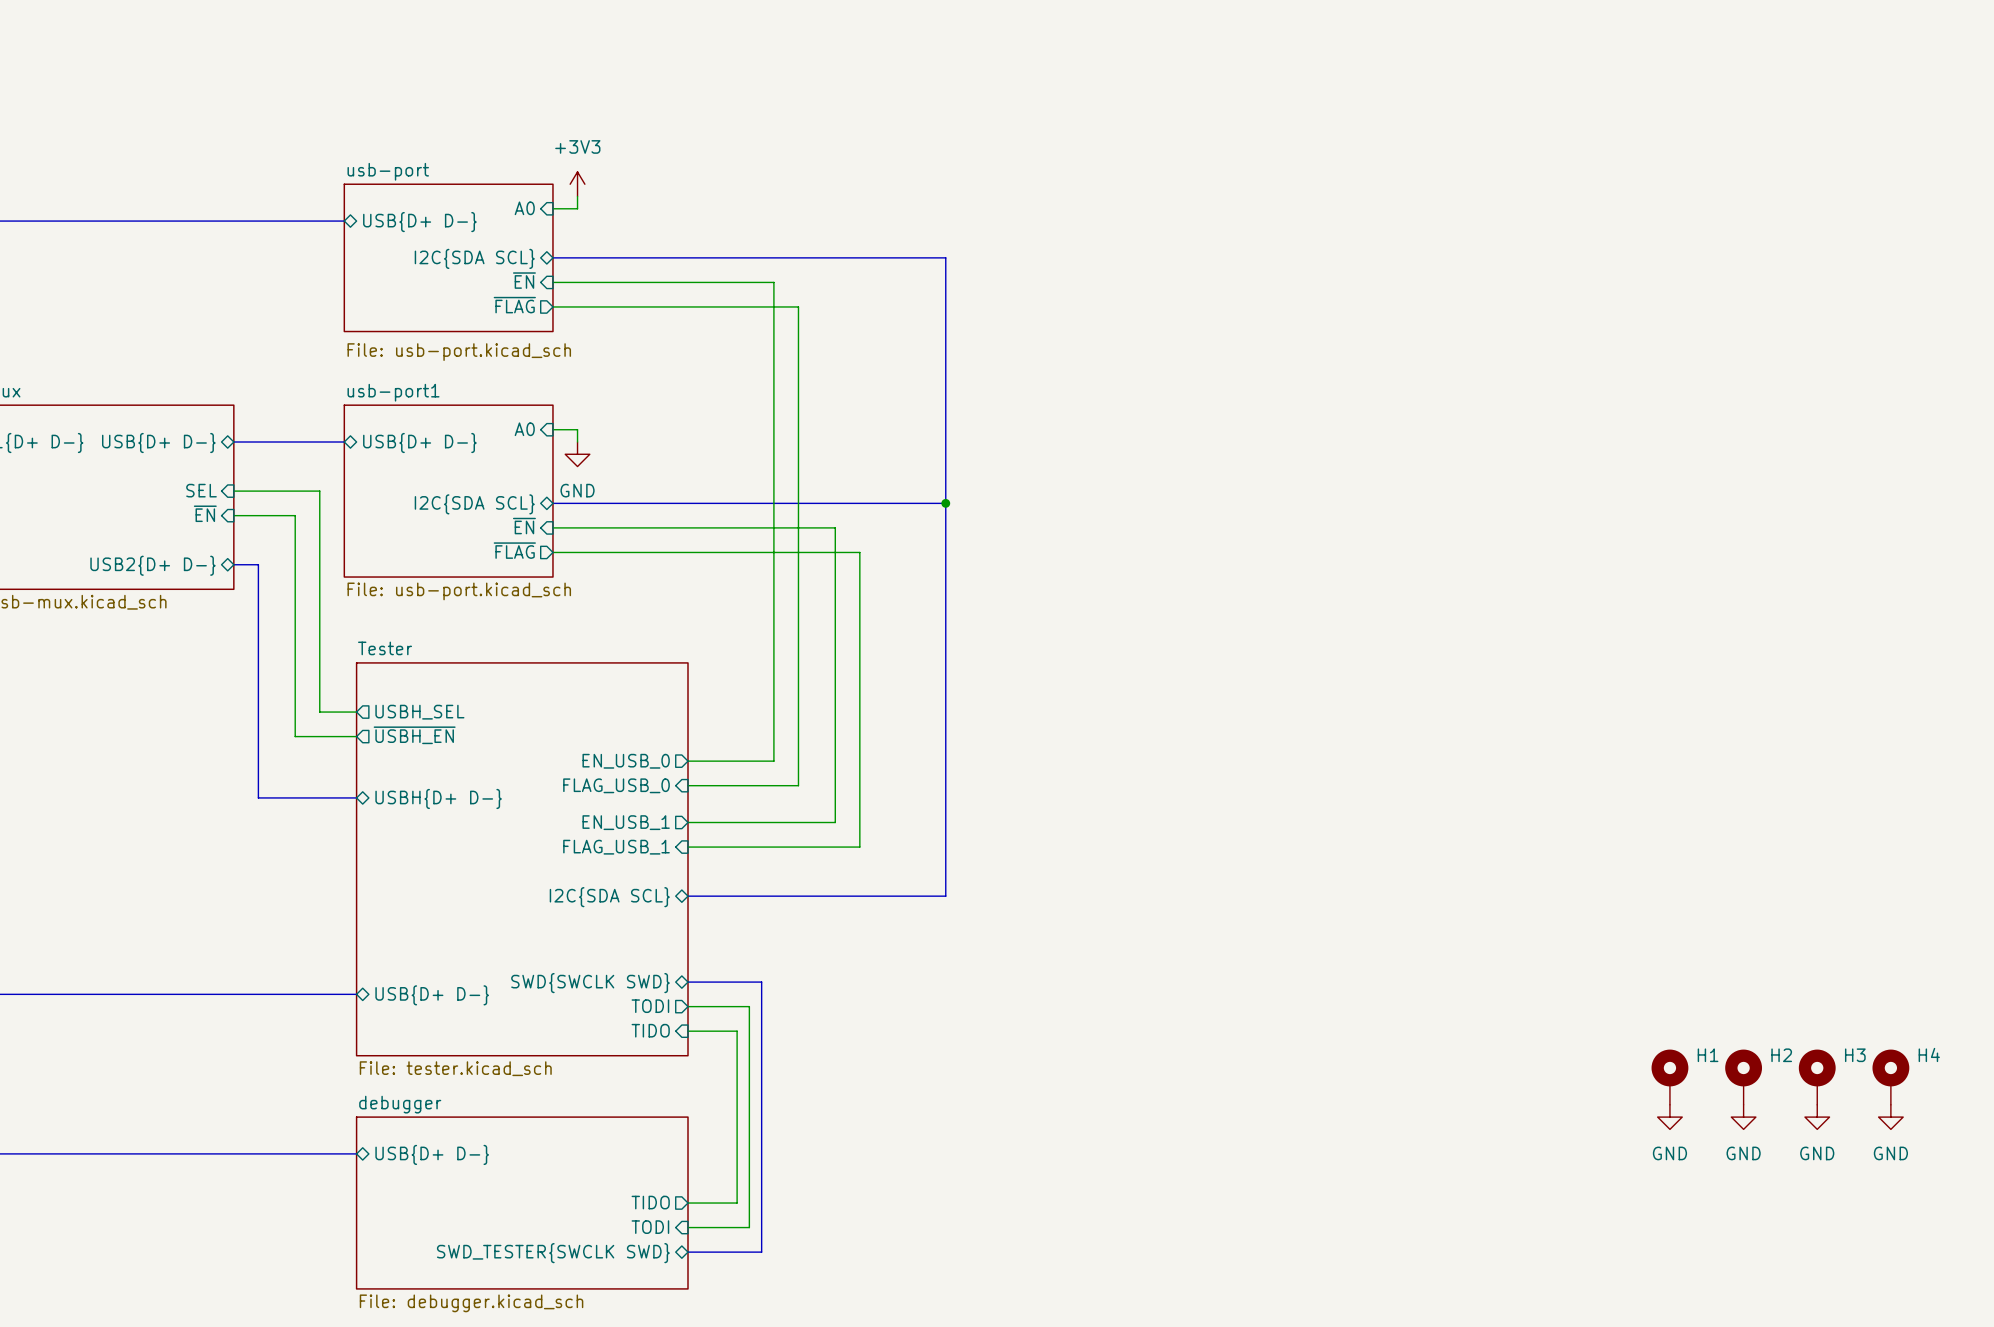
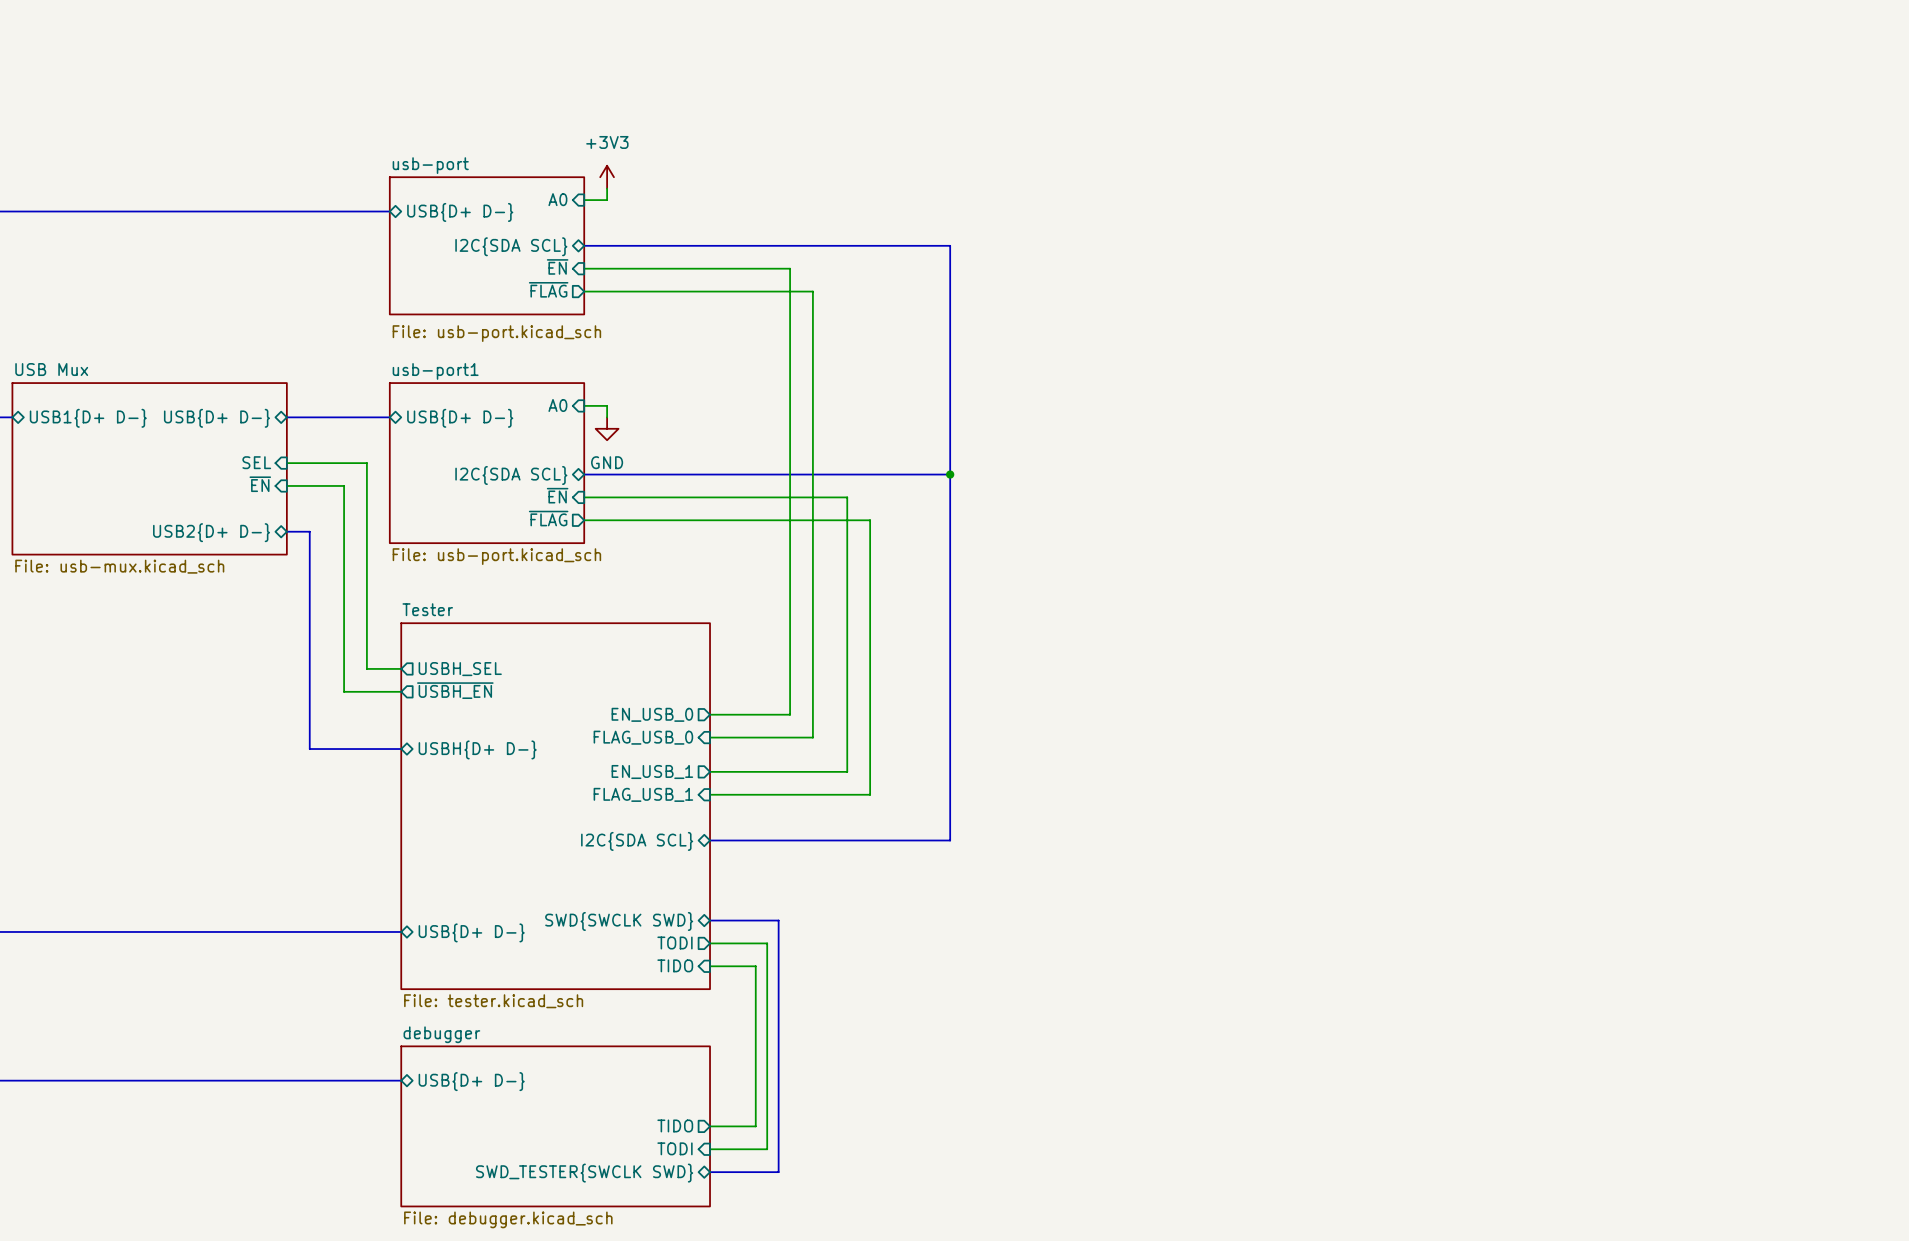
H1: (1669, 1077) -> none
H2: (1743, 1077) -> none
H3: (1817, 1077) -> none
H4: (1890, 1077) -> none
power symbol: GND (1669, 1117) -> none
power symbol: GND (1743, 1117) -> none
power symbol: GND (1817, 1117) -> none
power symbol: GND (1890, 1117) -> none

